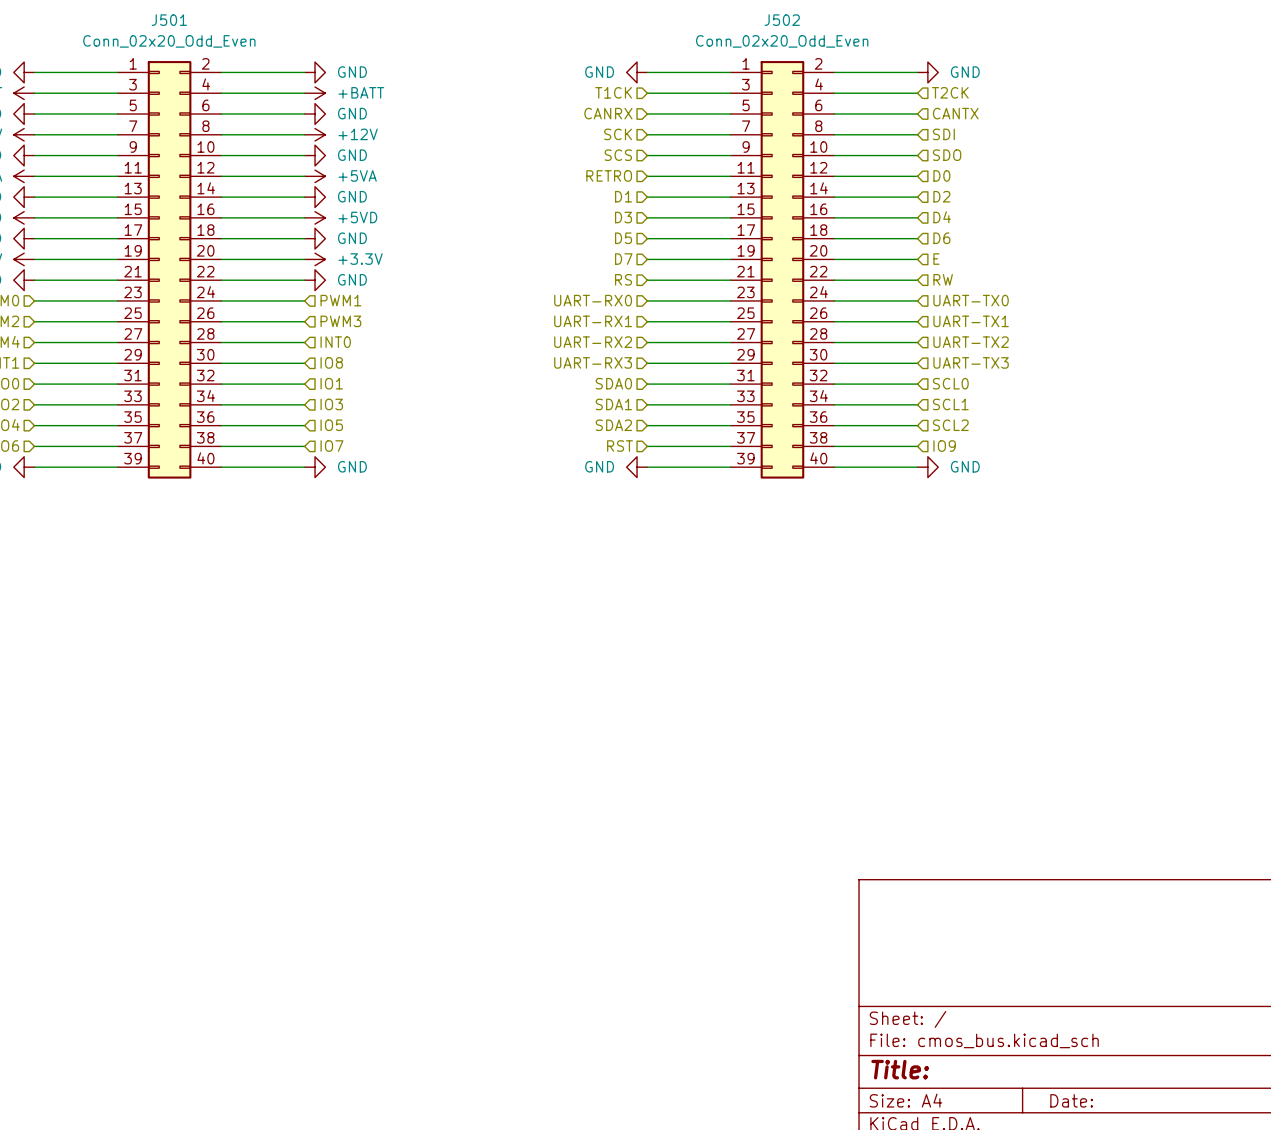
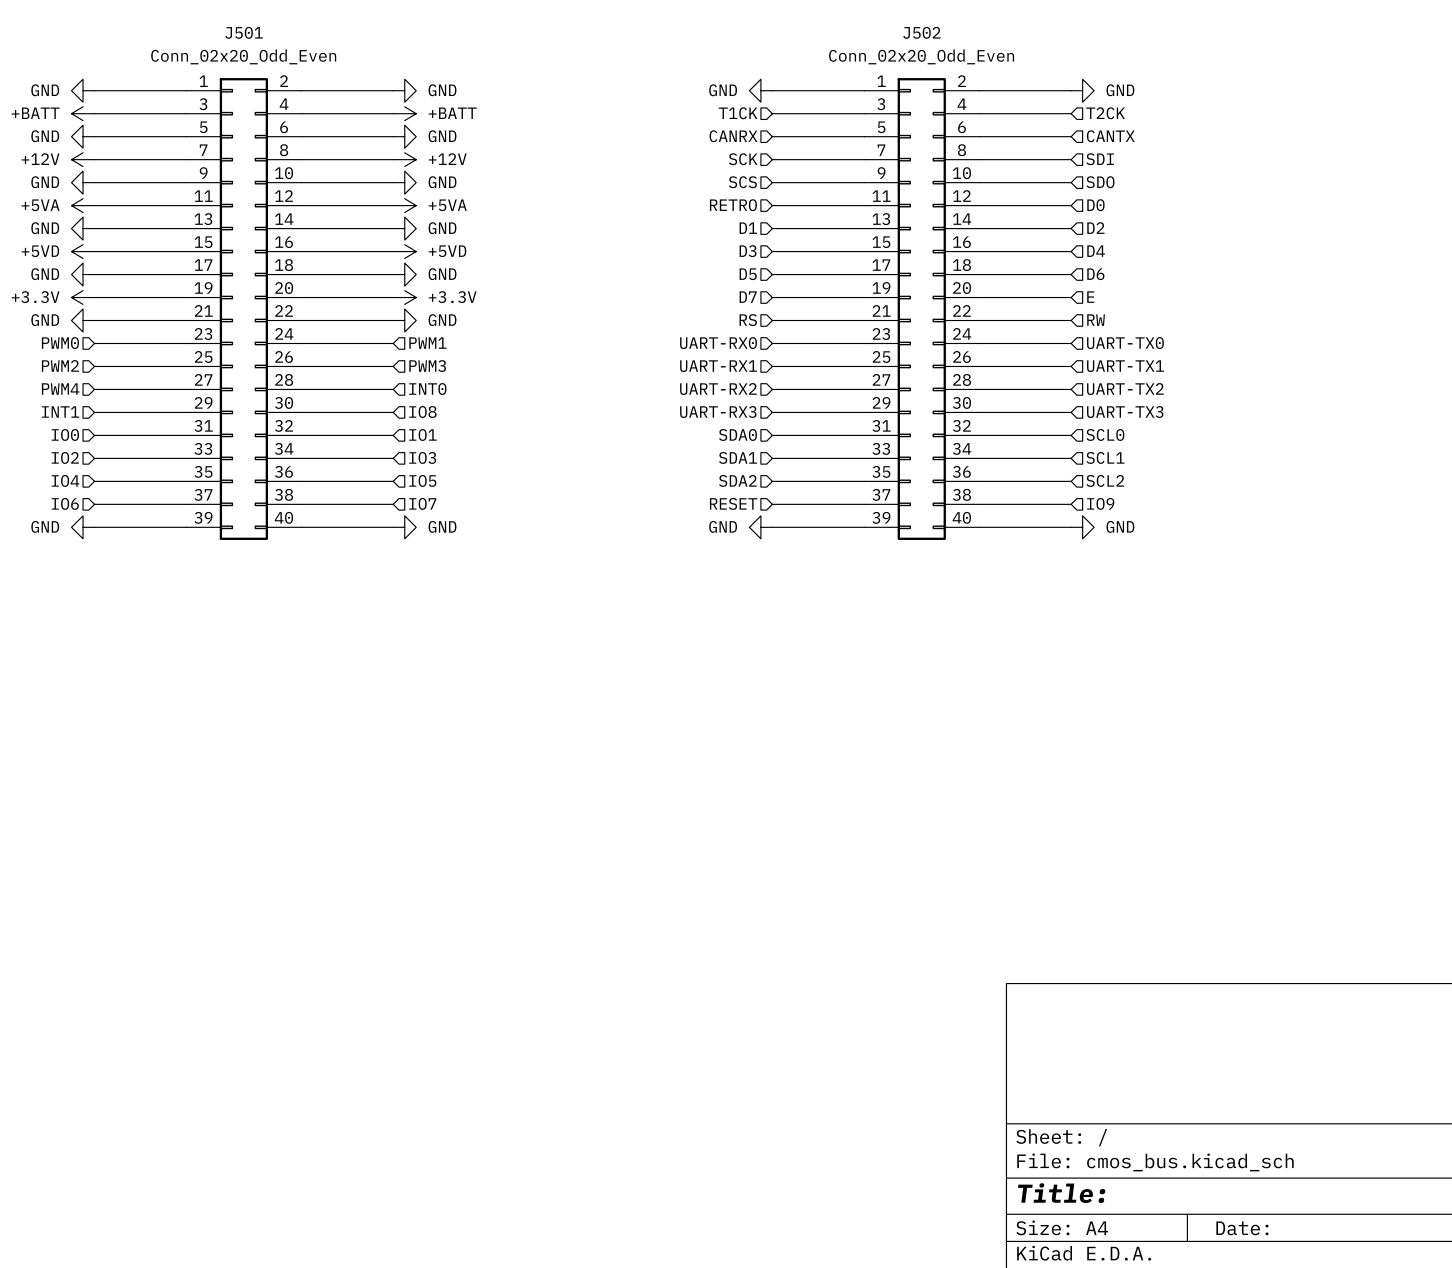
hierarchical label: RST (620, 446) -> RESET (733, 503)

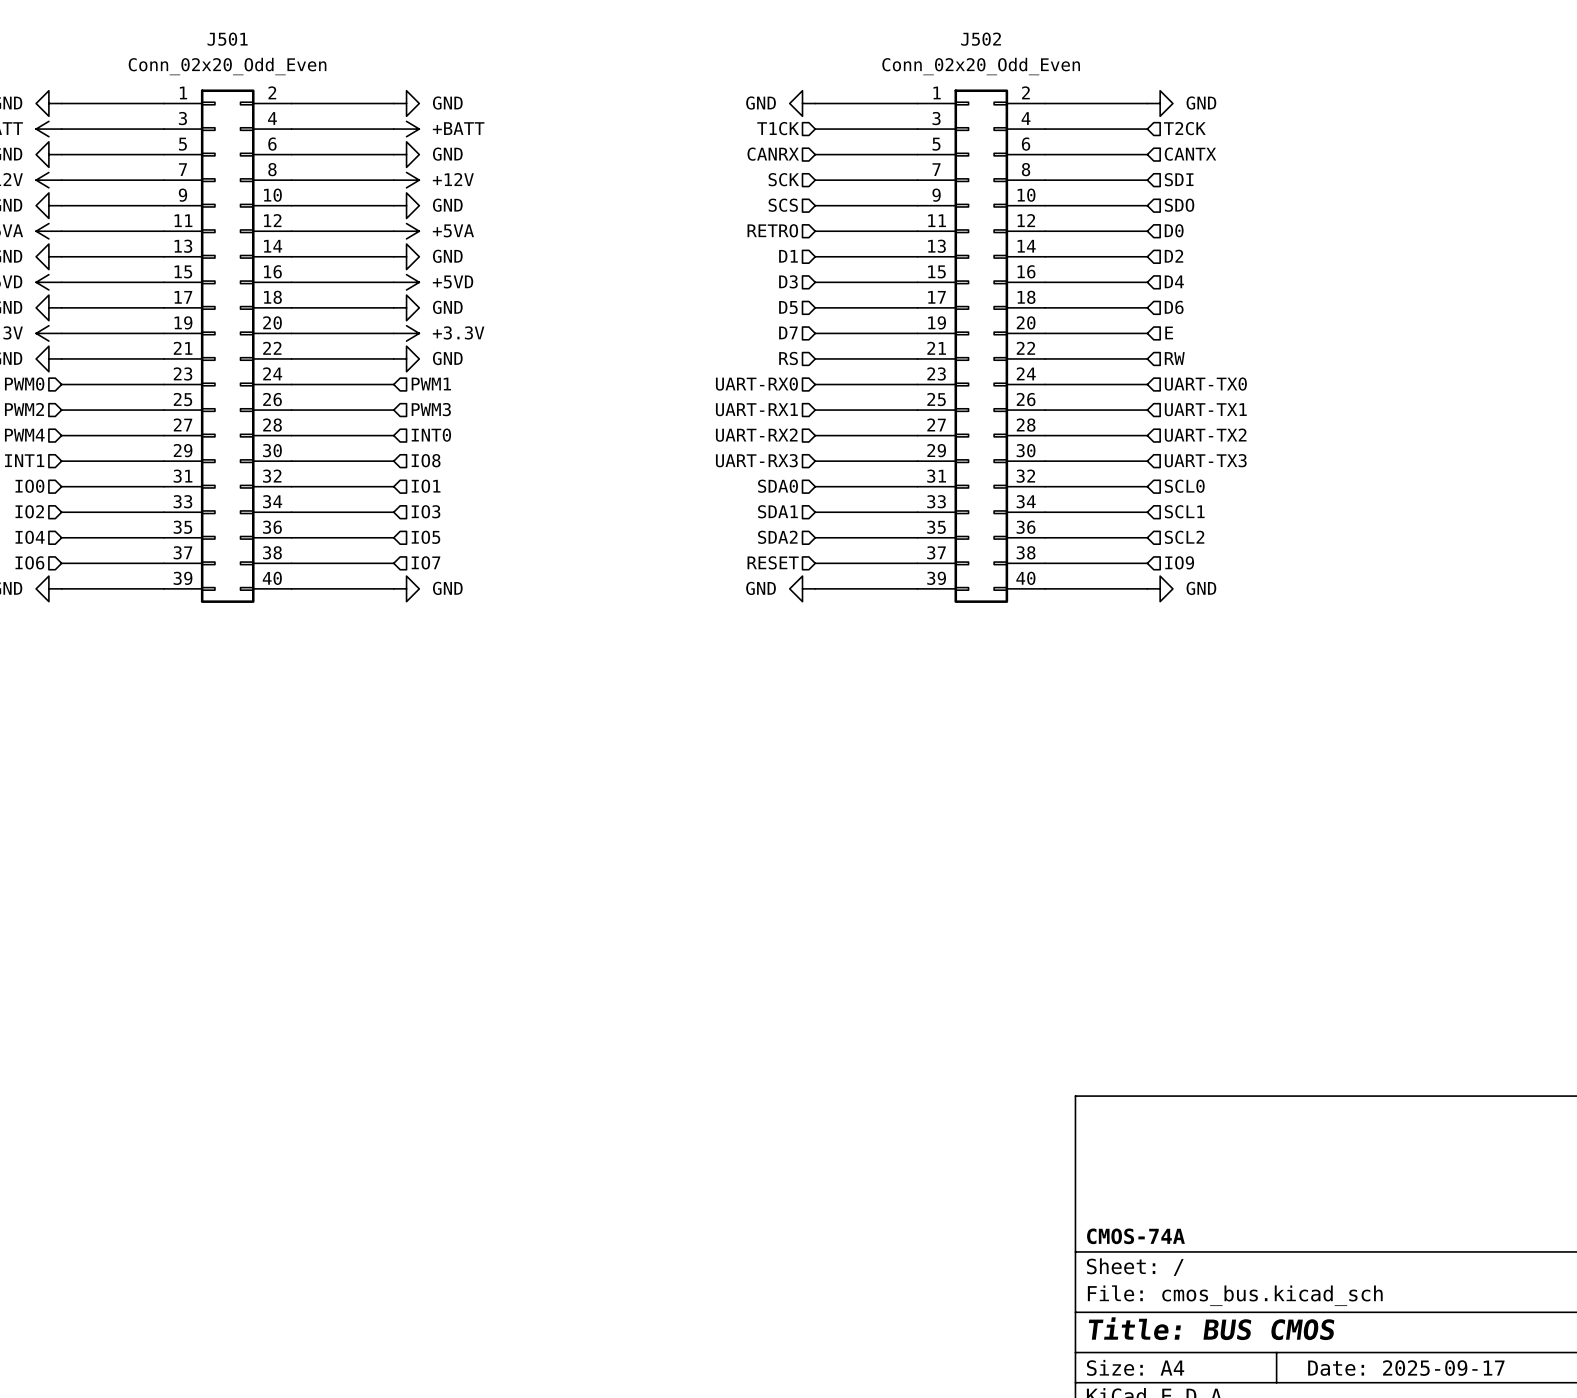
title block: none -> CMOS-74A (1135, 1236)
title block: Title: (1061, 1193) -> Title: BUS CMOS (1211, 1328)
title block: Date: (1242, 1228) -> Date: 2025-09-17 (1406, 1368)

